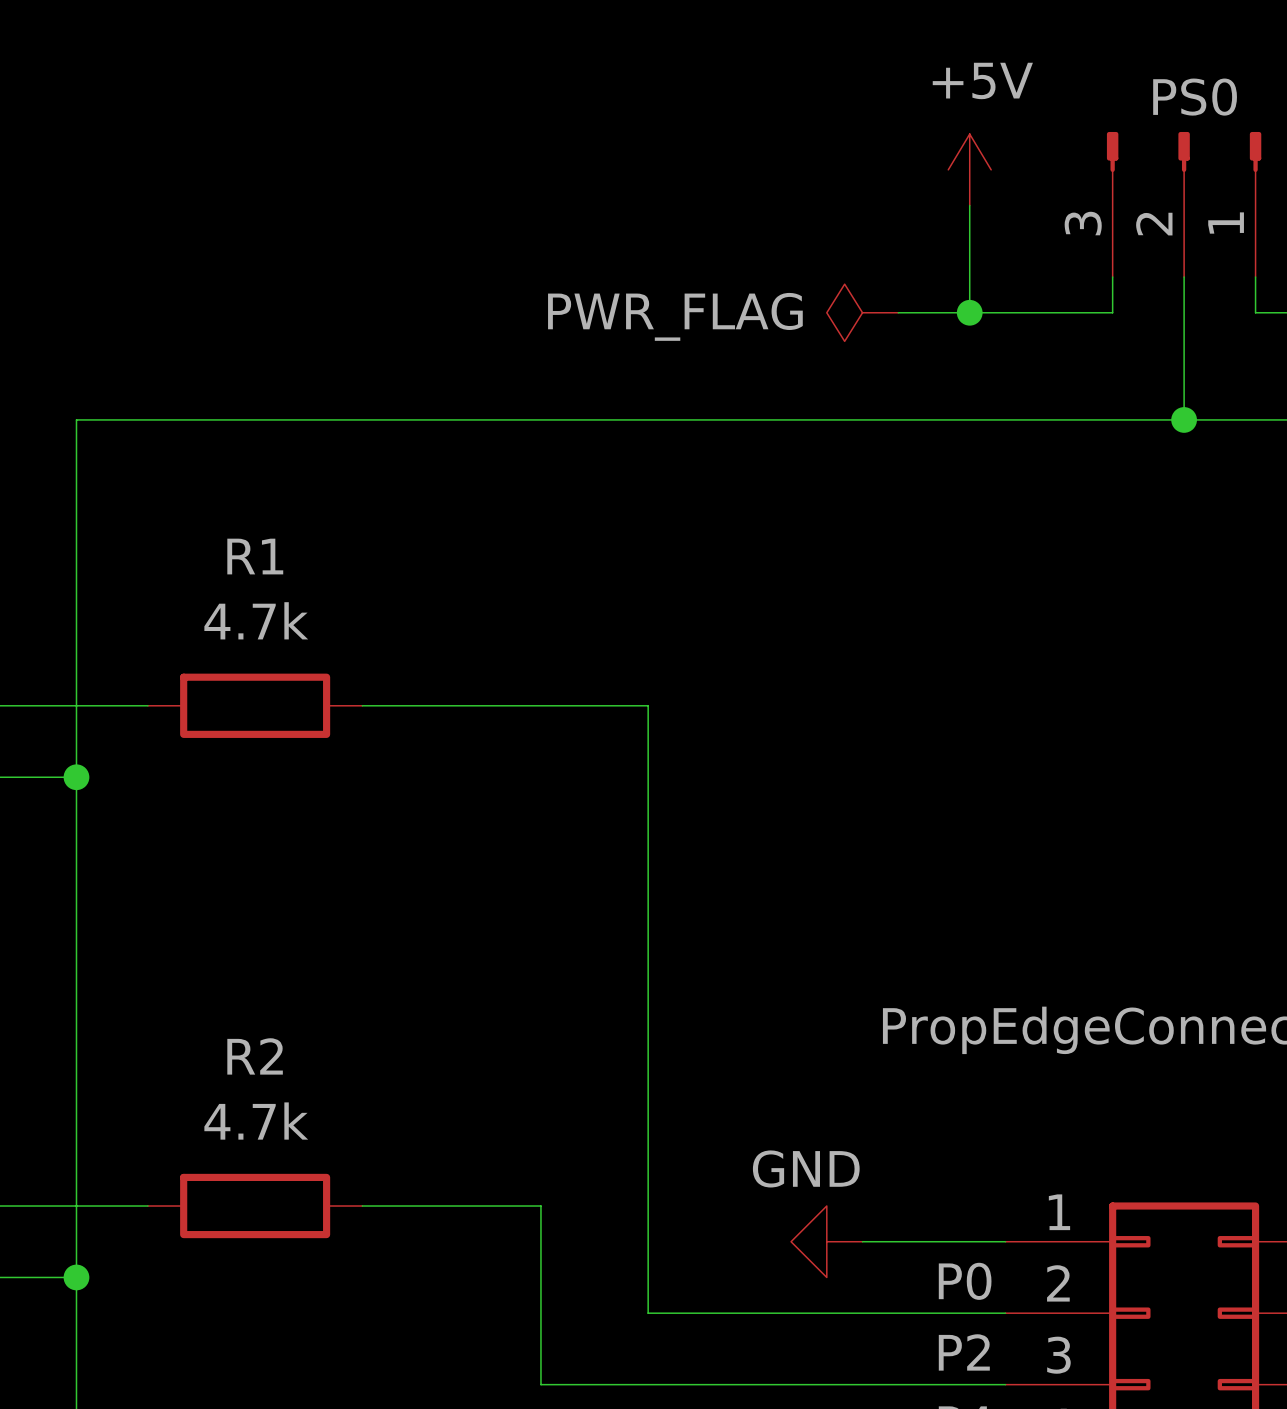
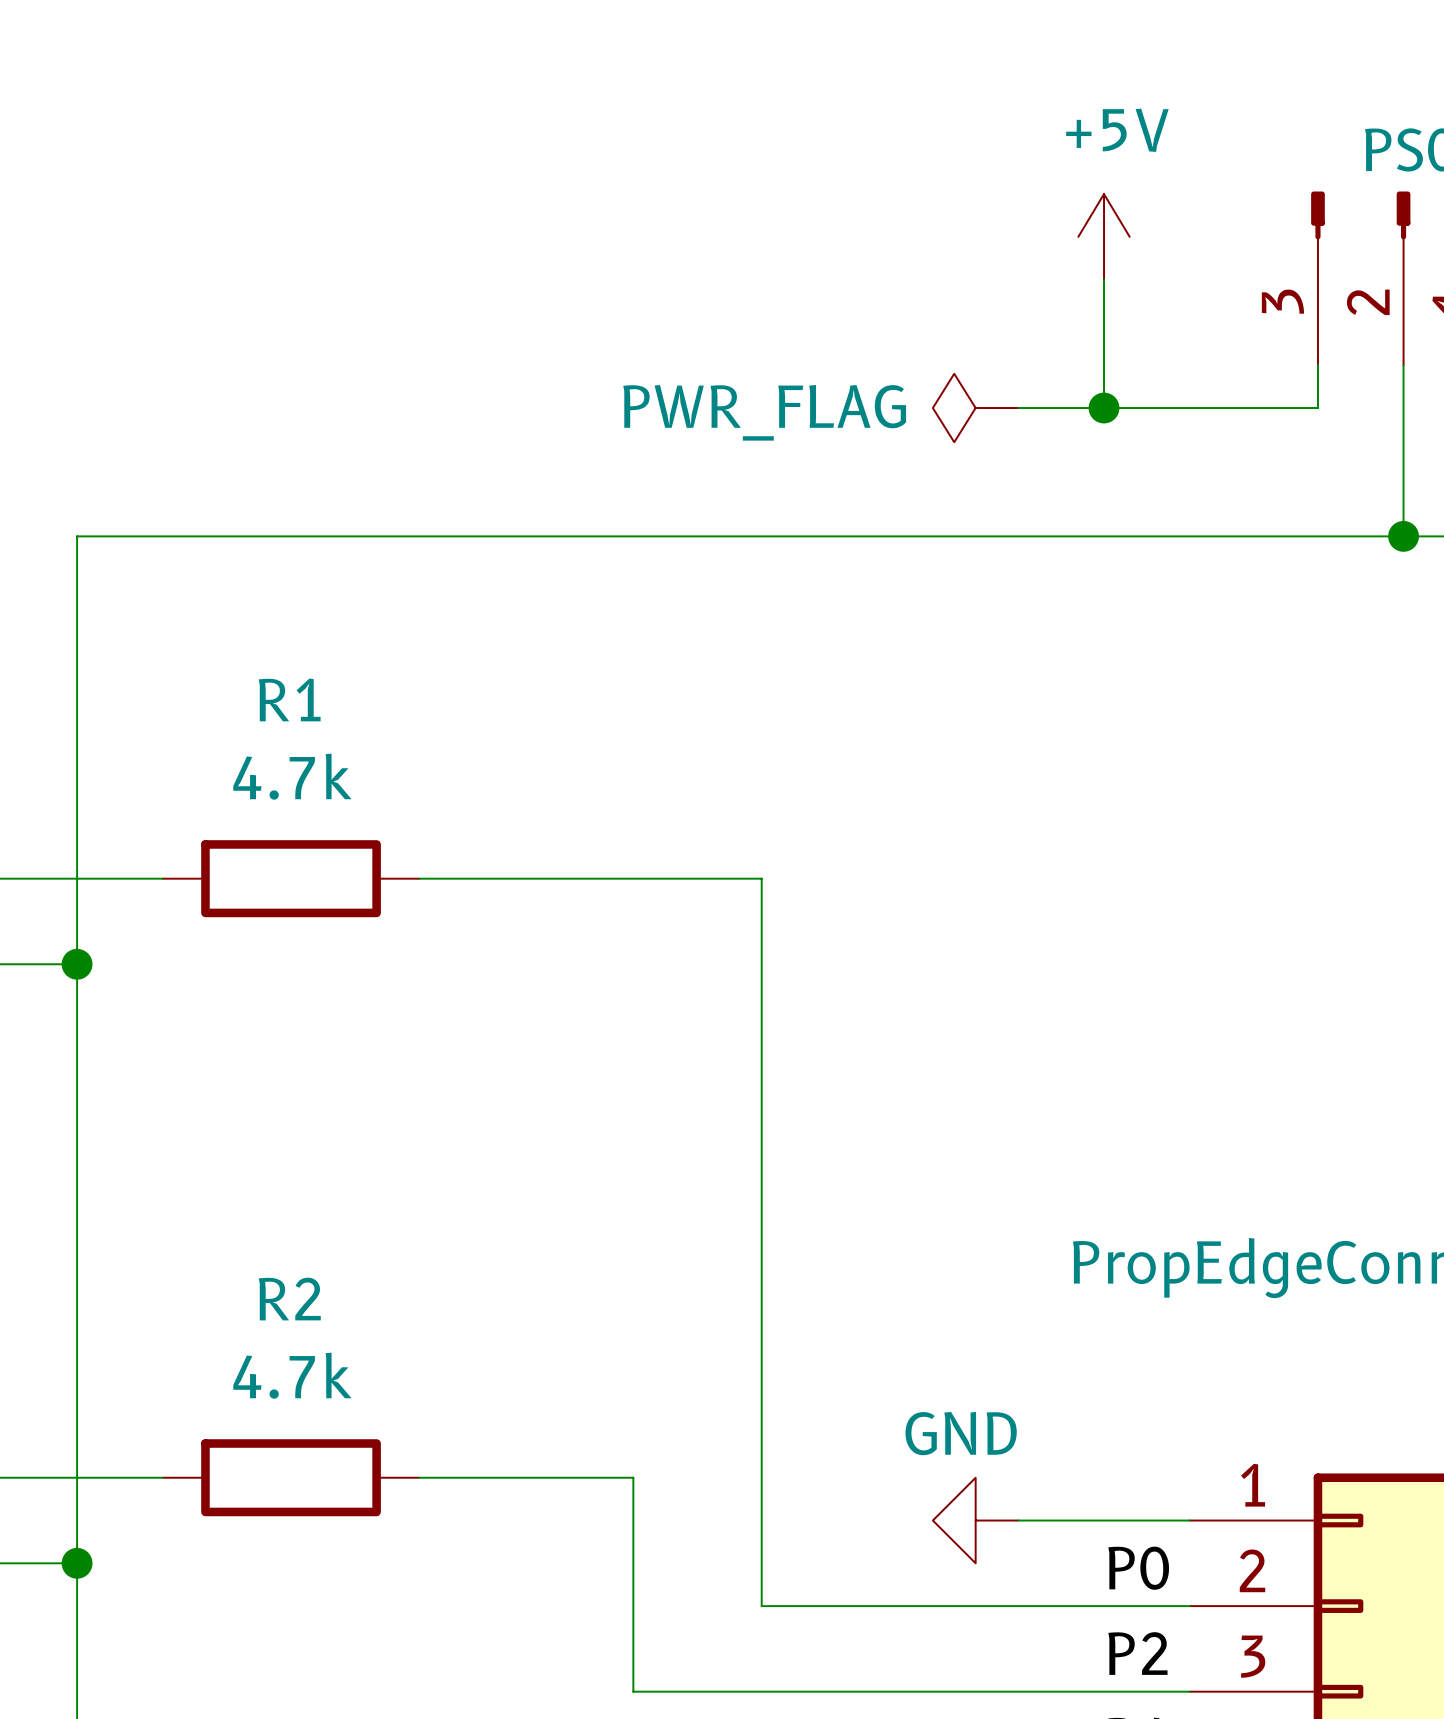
power symbol position: +5V (969, 169) -> +5V (1104, 236)
wire: (969, 205) (969, 312) -> (1104, 279) (1104, 408)
power symbol position: PWR_FLAG (862, 312) -> PWR_FLAG (975, 408)
junction position: (969, 312) -> (1104, 408)

